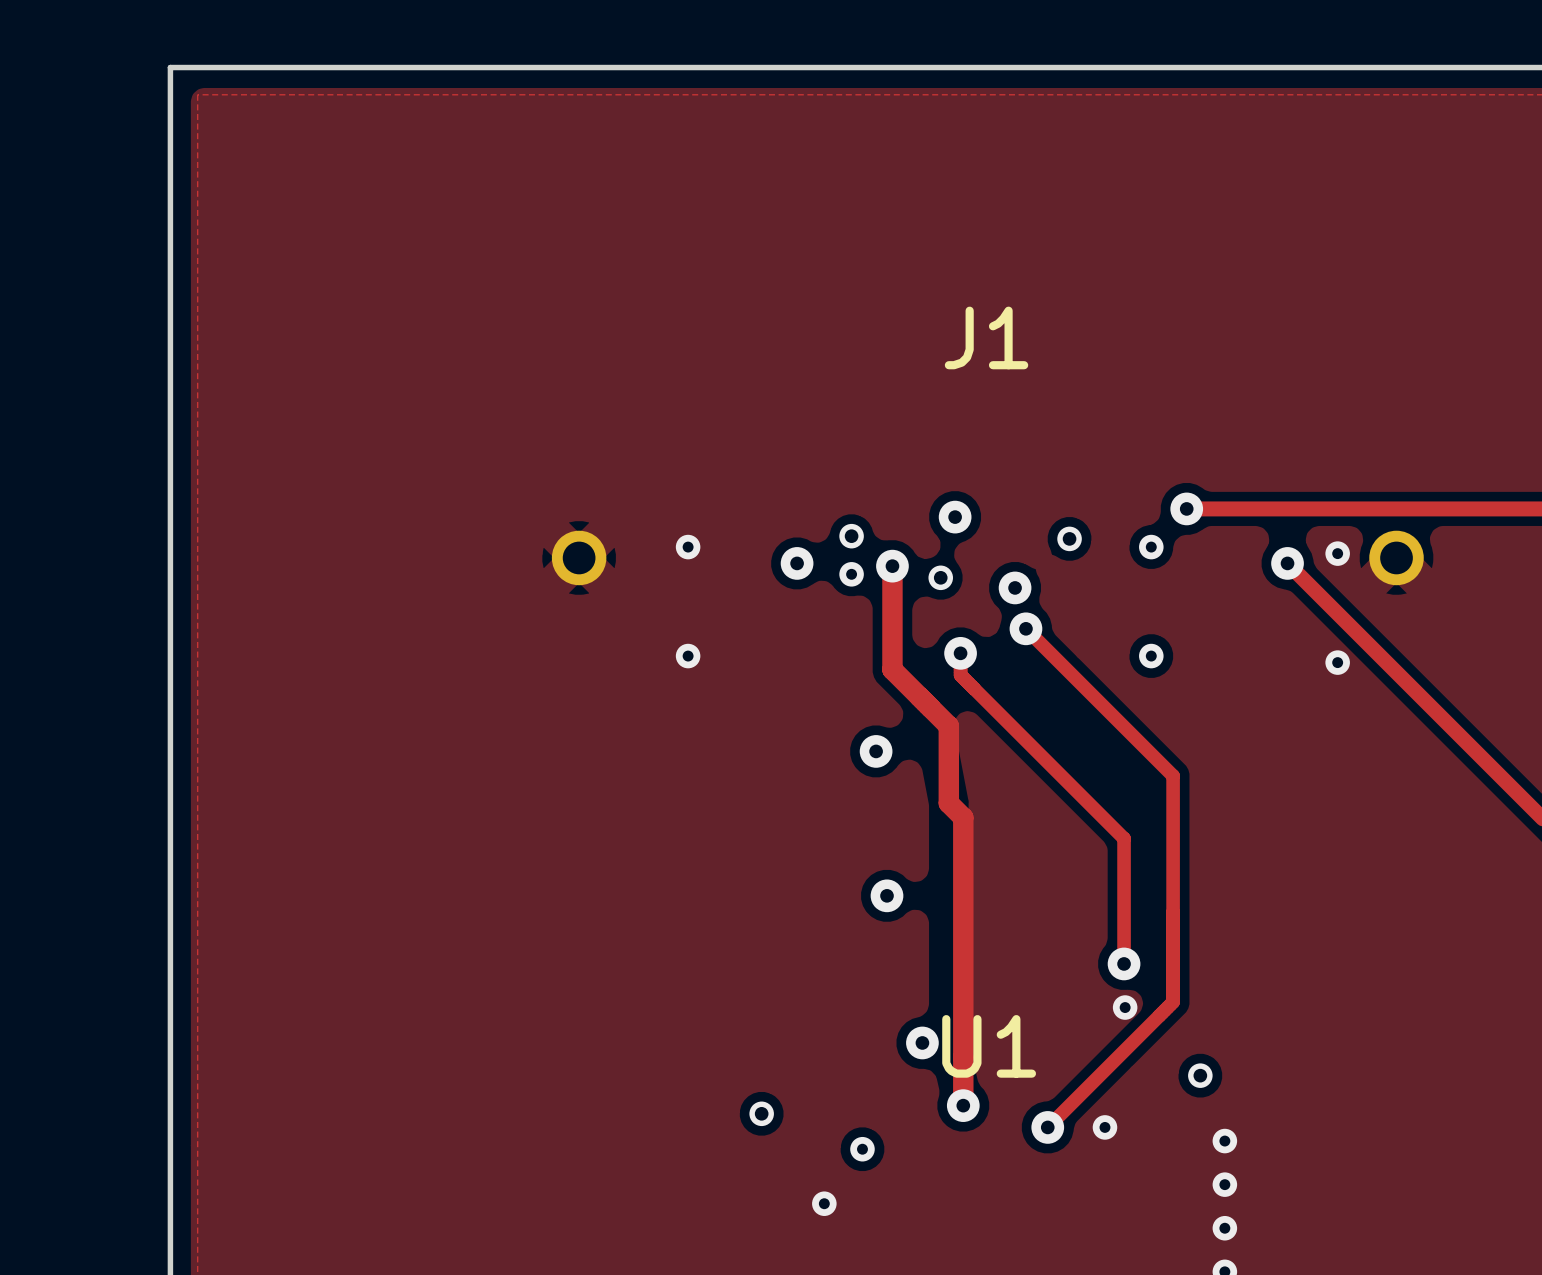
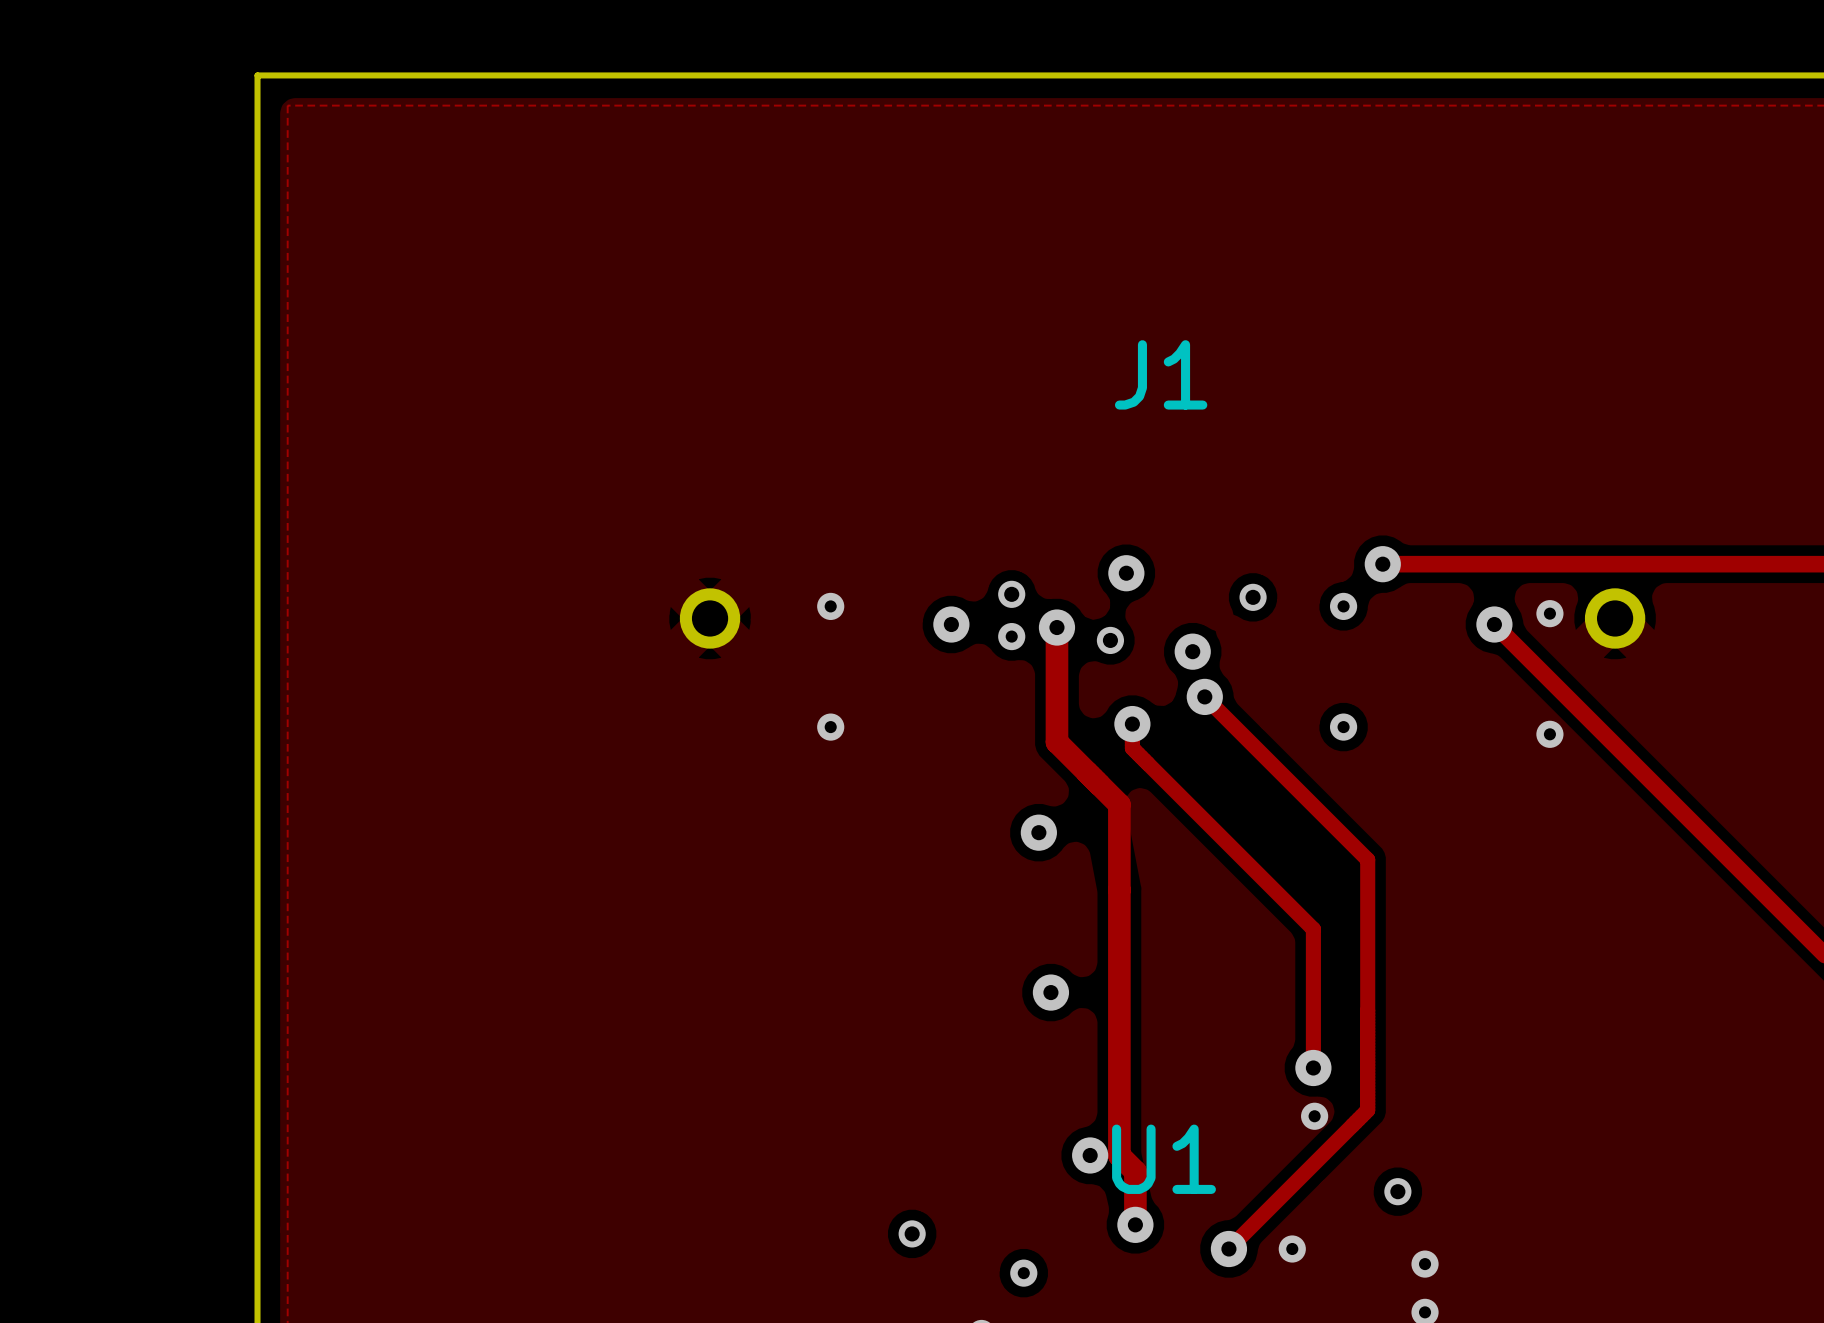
track: (948, 803) (963, 817) (963, 1057) -> (1119, 889) (1119, 1155) (1135, 1171)

